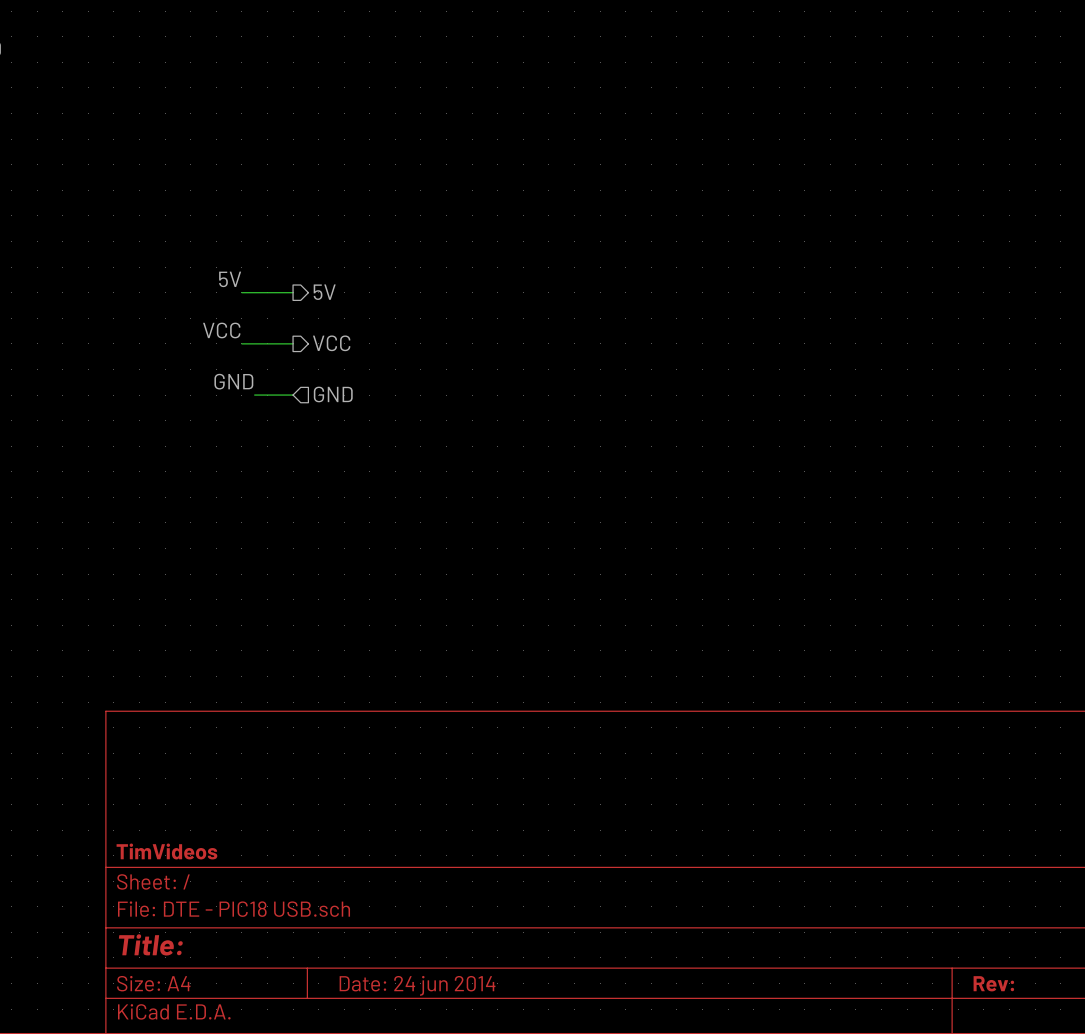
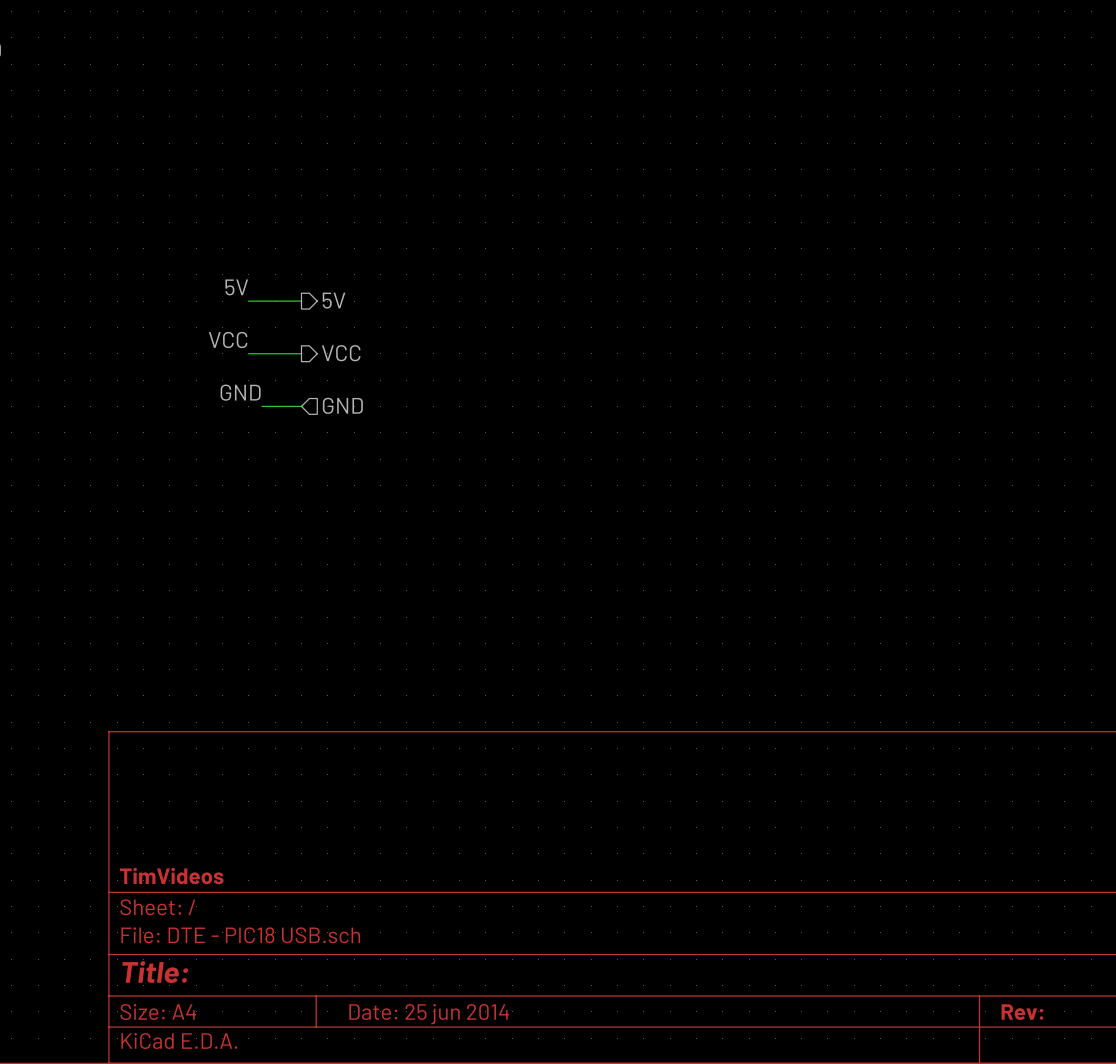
title block: Date: 24 jun 2014 (417, 985) -> Date: 25 jun 2014 (429, 1014)

